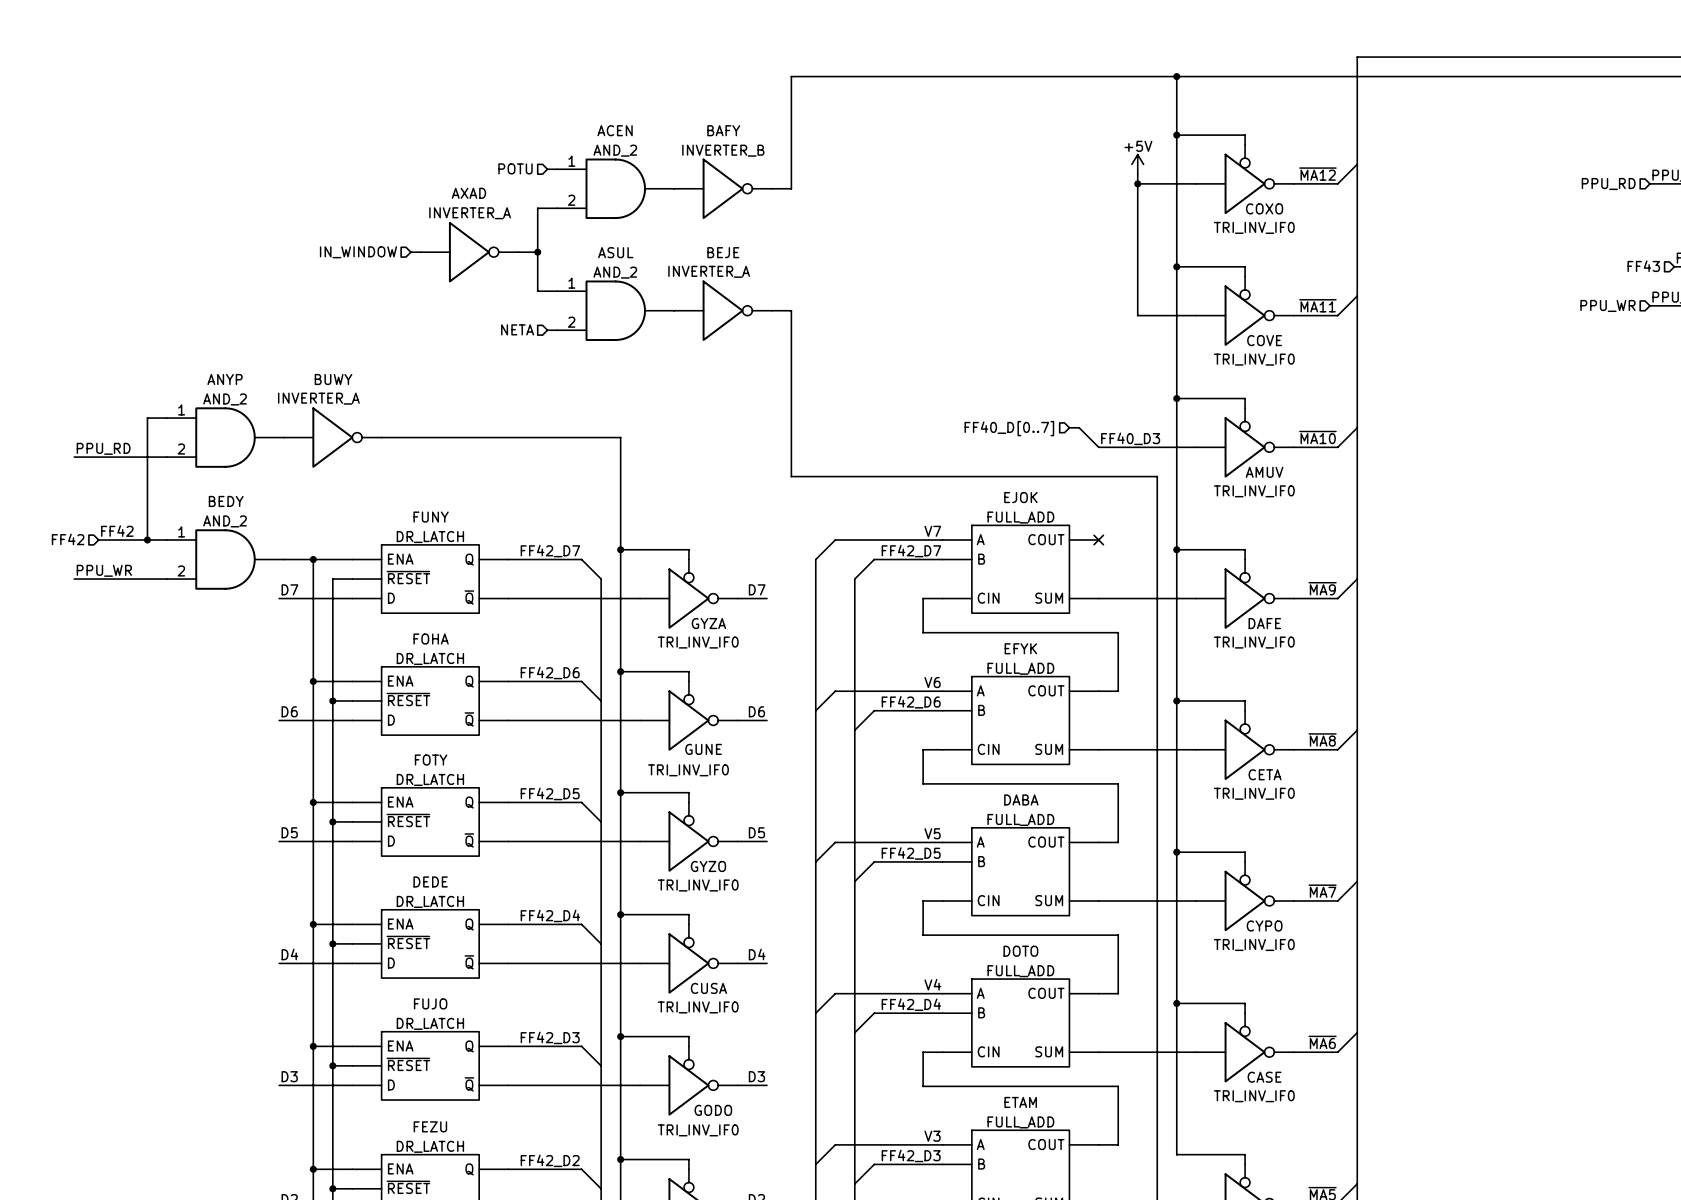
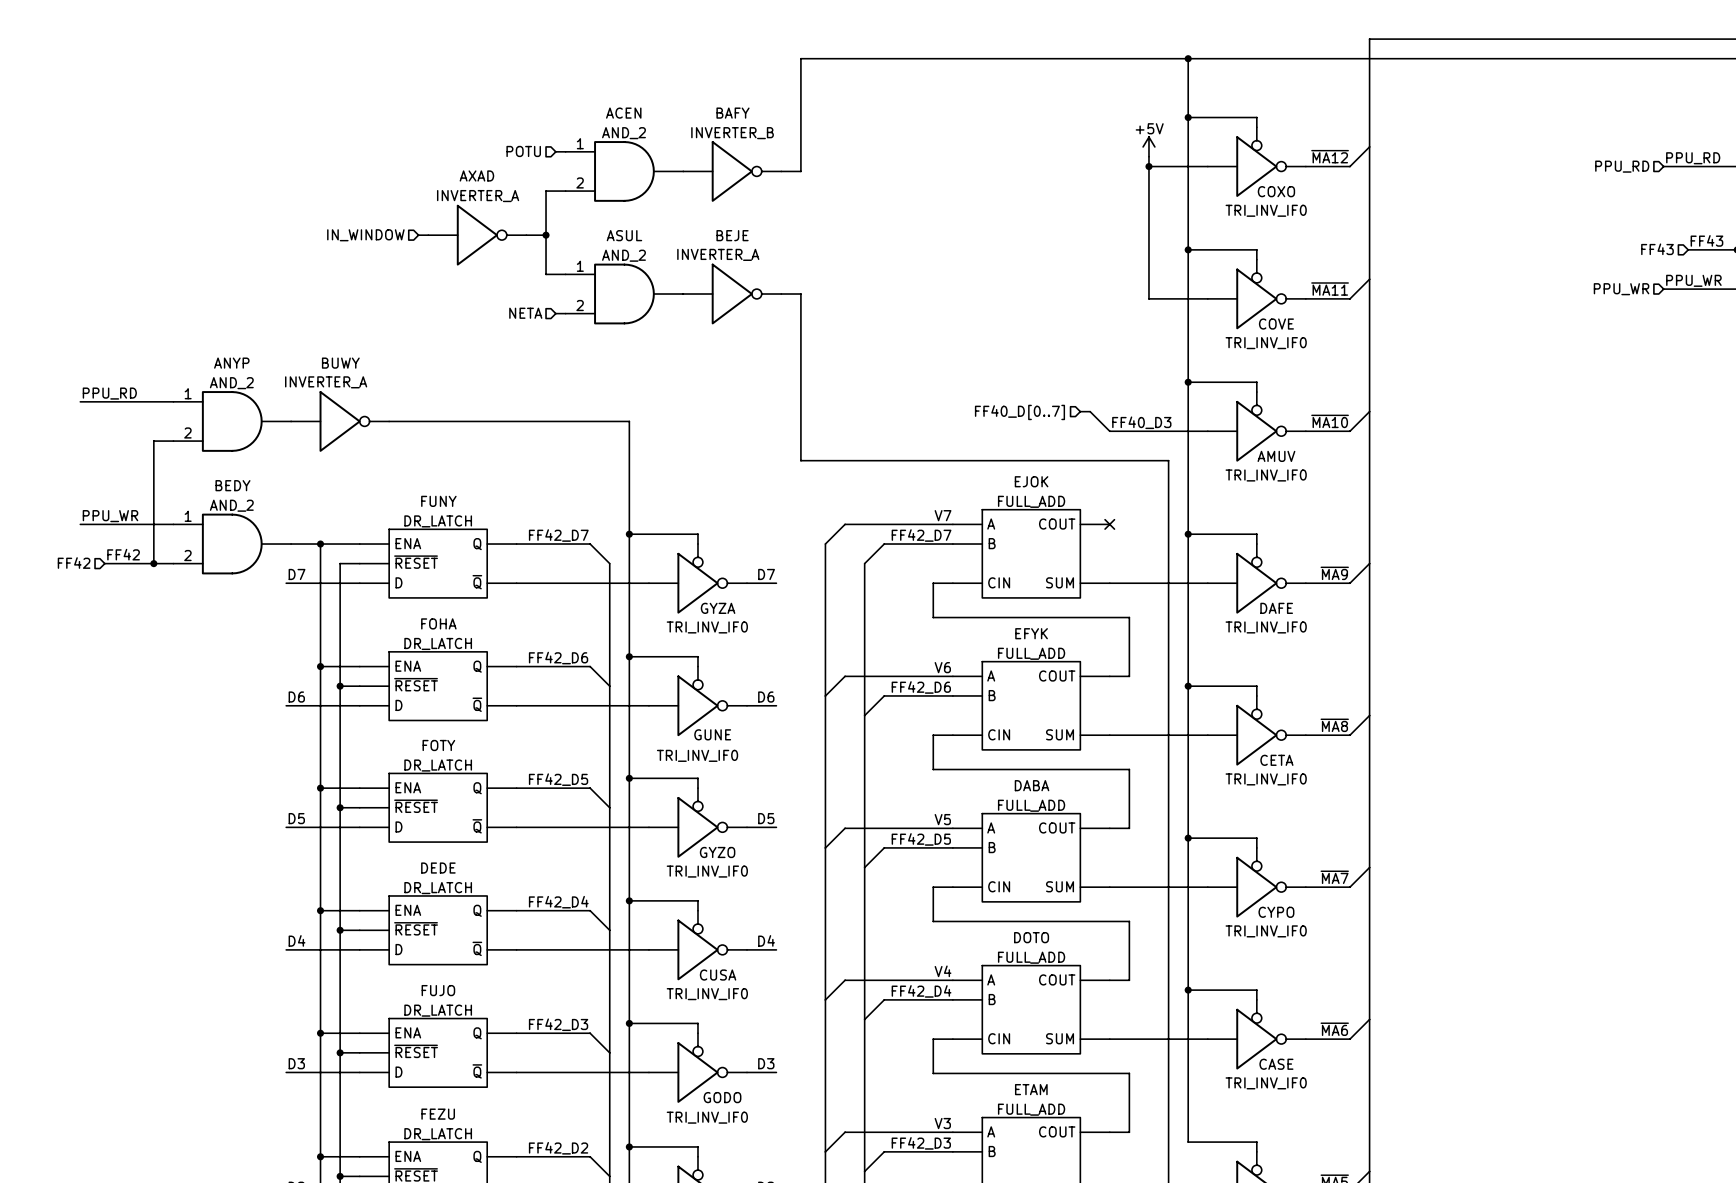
wire: (147, 418) (147, 457) (74, 457) -> (153, 401) (80, 401)
label position: PPU_RD (103, 448) -> PPU_RD (109, 393)
label position: FF42 (117, 531) -> FF42 (123, 554)
hierarchical label position: FF42 (68, 539) -> FF42 (74, 563)
wire: none -> (153, 524) (153, 563)
junction position: (147, 540) -> (153, 563)
label position: PPU_WR (104, 570) -> PPU_WR (110, 516)
wire: (74, 579) (98, 579) -> (80, 524) (104, 524)

